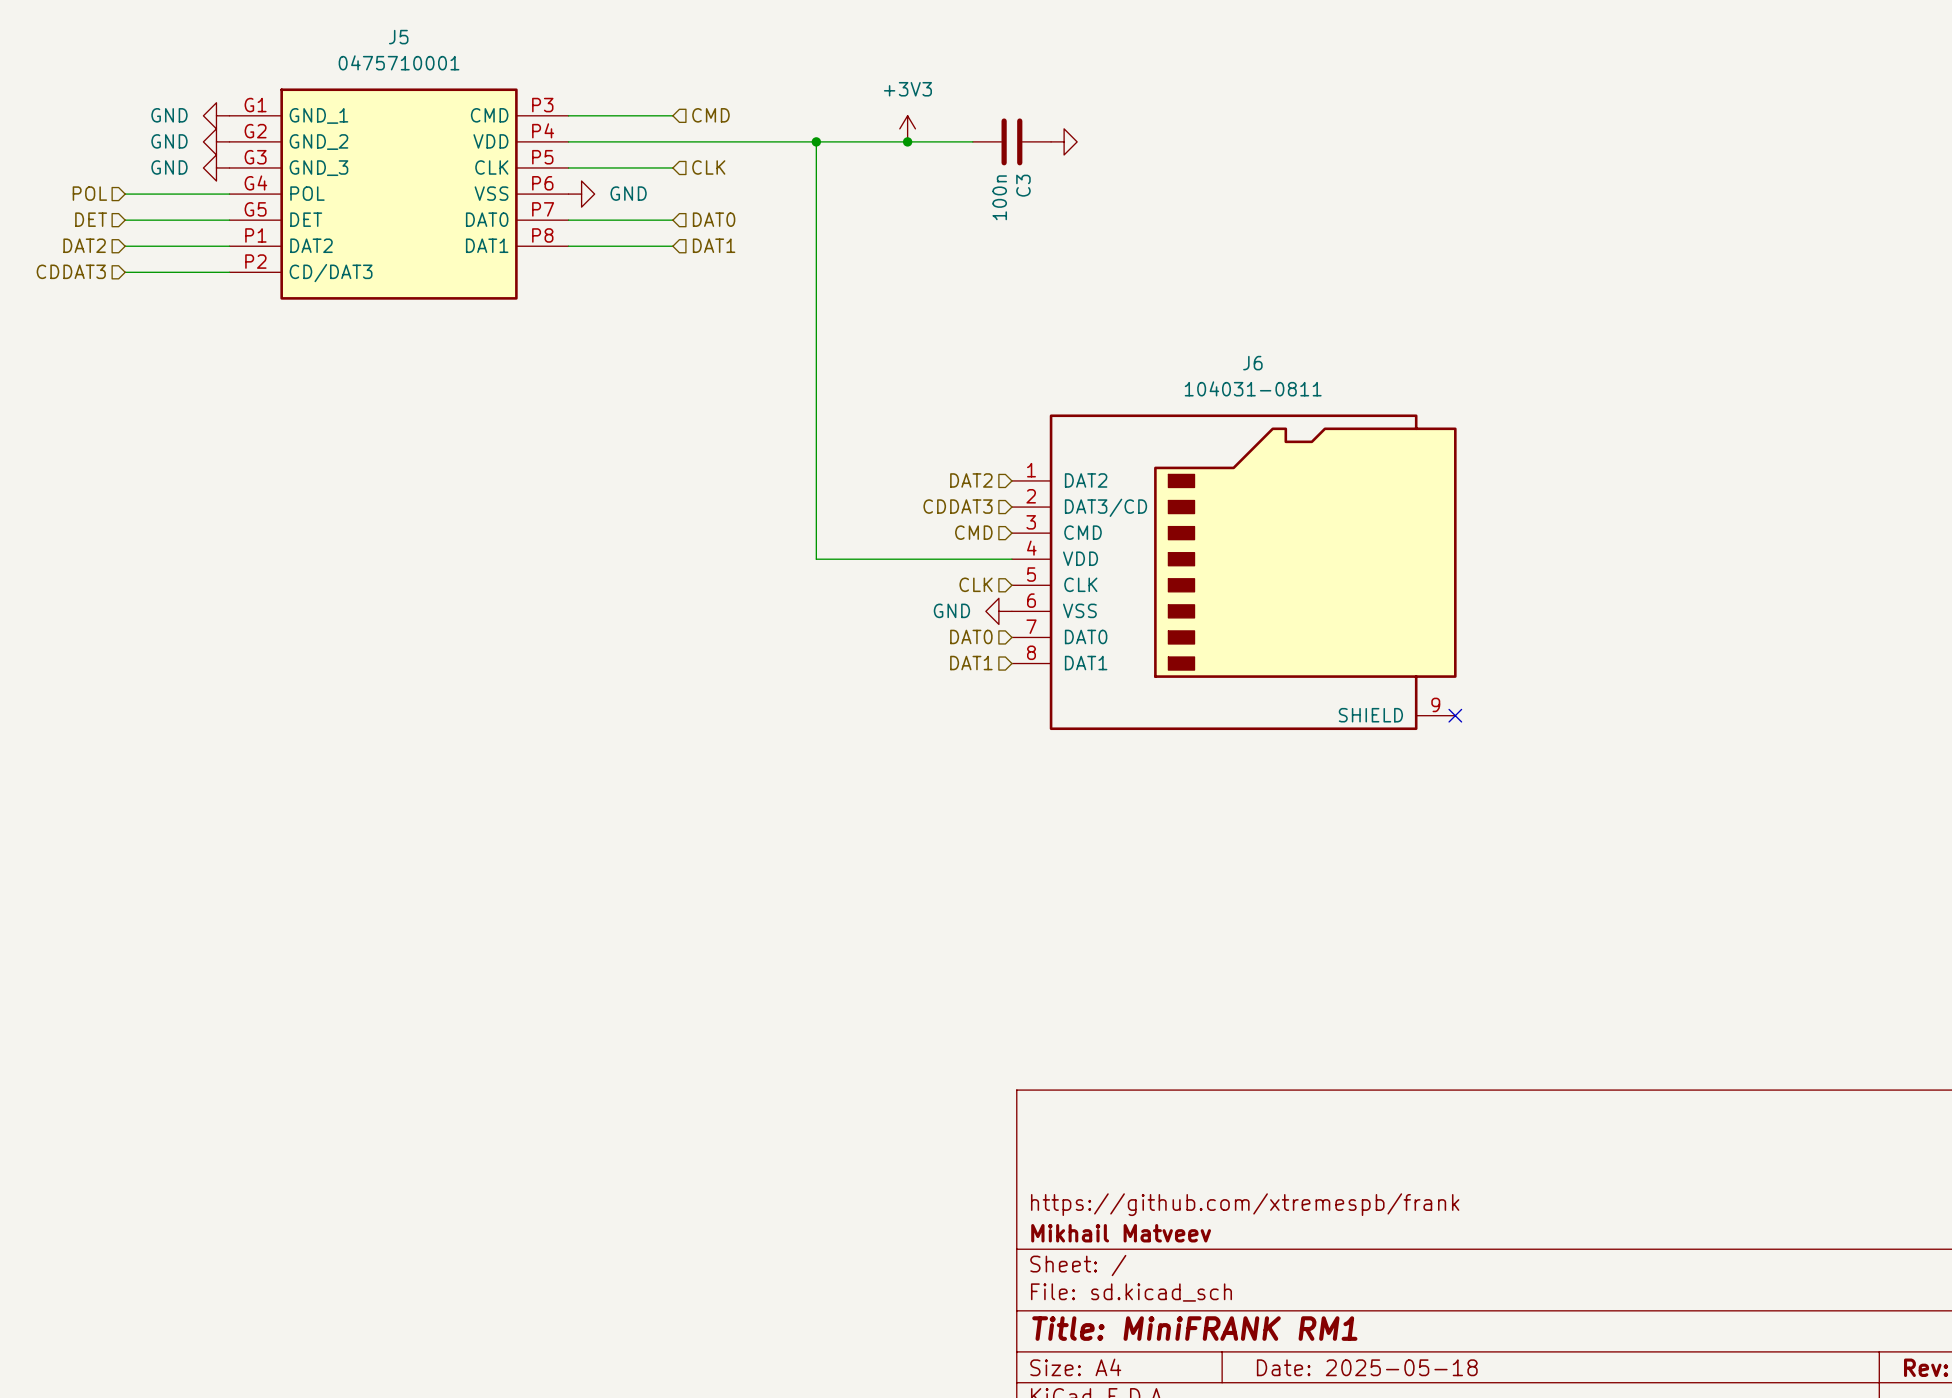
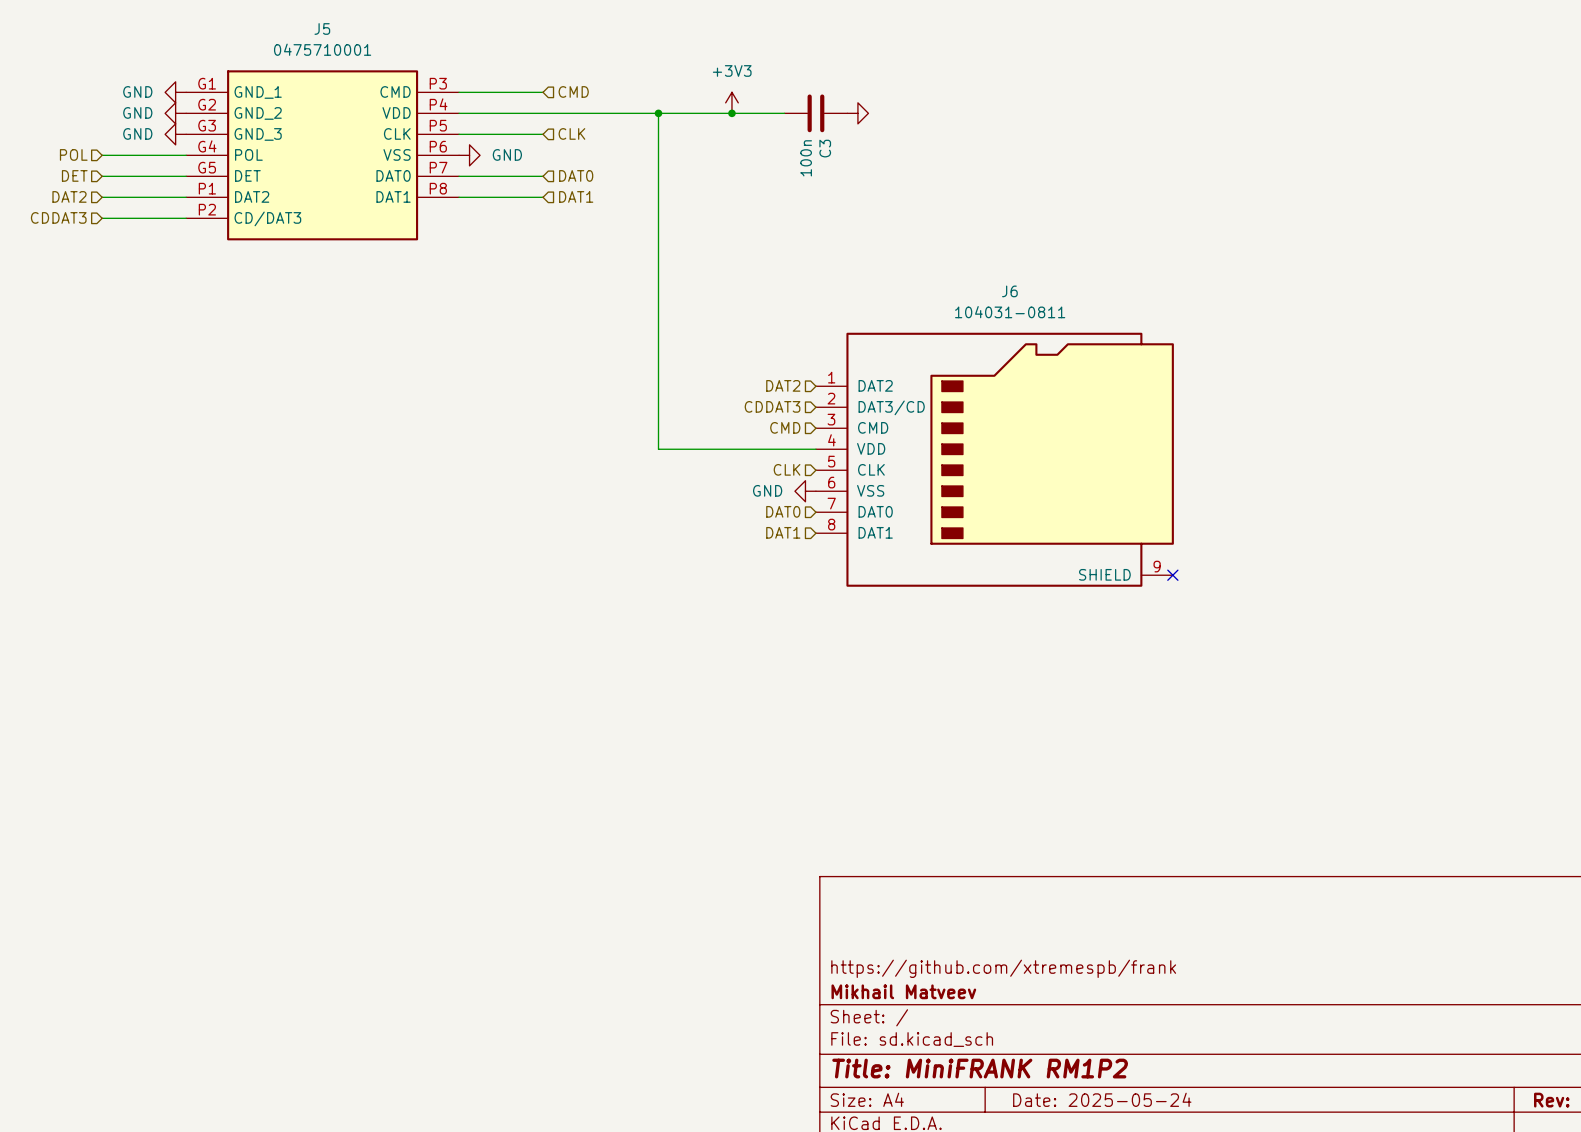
title block: Title: MiniFRANK RM1 (1194, 1328) -> Title: MiniFRANK RM1P2 (980, 1068)
title block: Date: 2025-05-18 (1367, 1367) -> Date: 2025-05-24 (1102, 1099)

